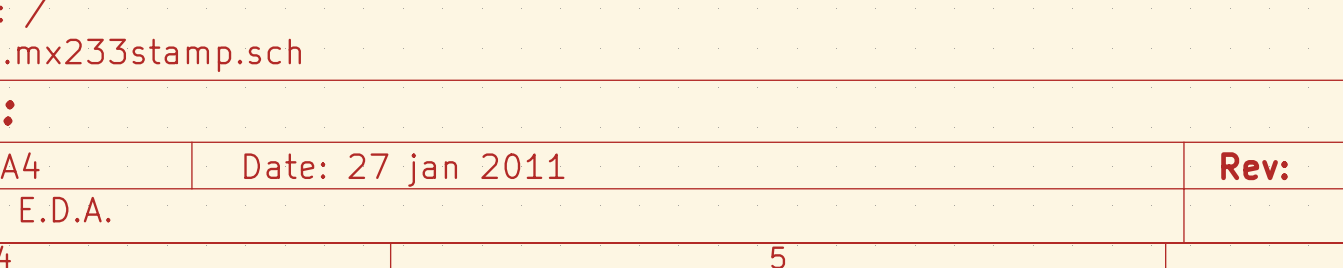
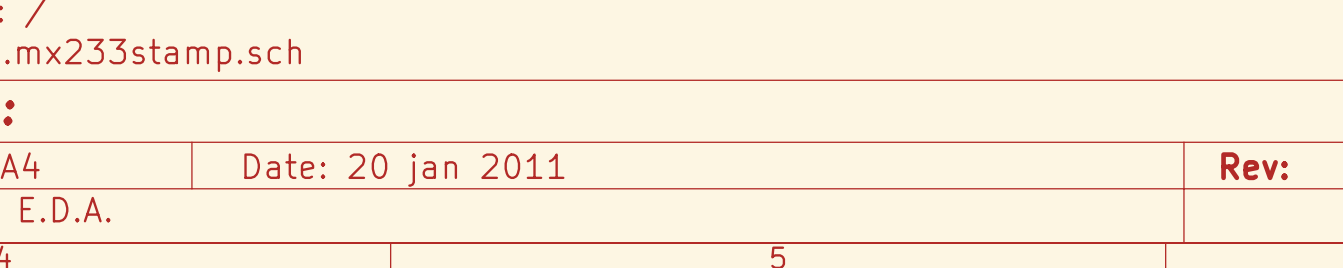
title block: Date: 27 jan 2011 (404, 170) -> Date: 20 jan 2011 (404, 170)

